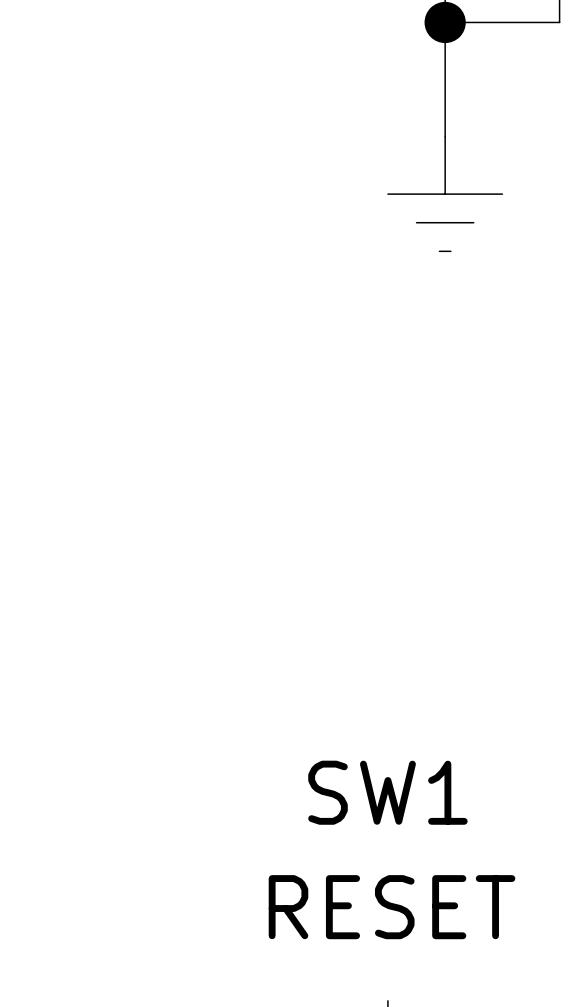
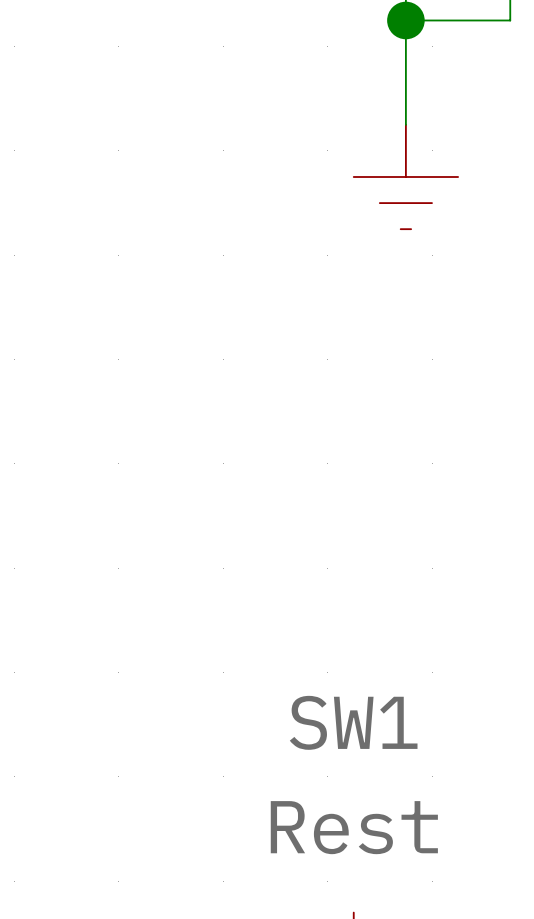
SW1 value: RESET (392, 907) -> Rest (354, 827)

